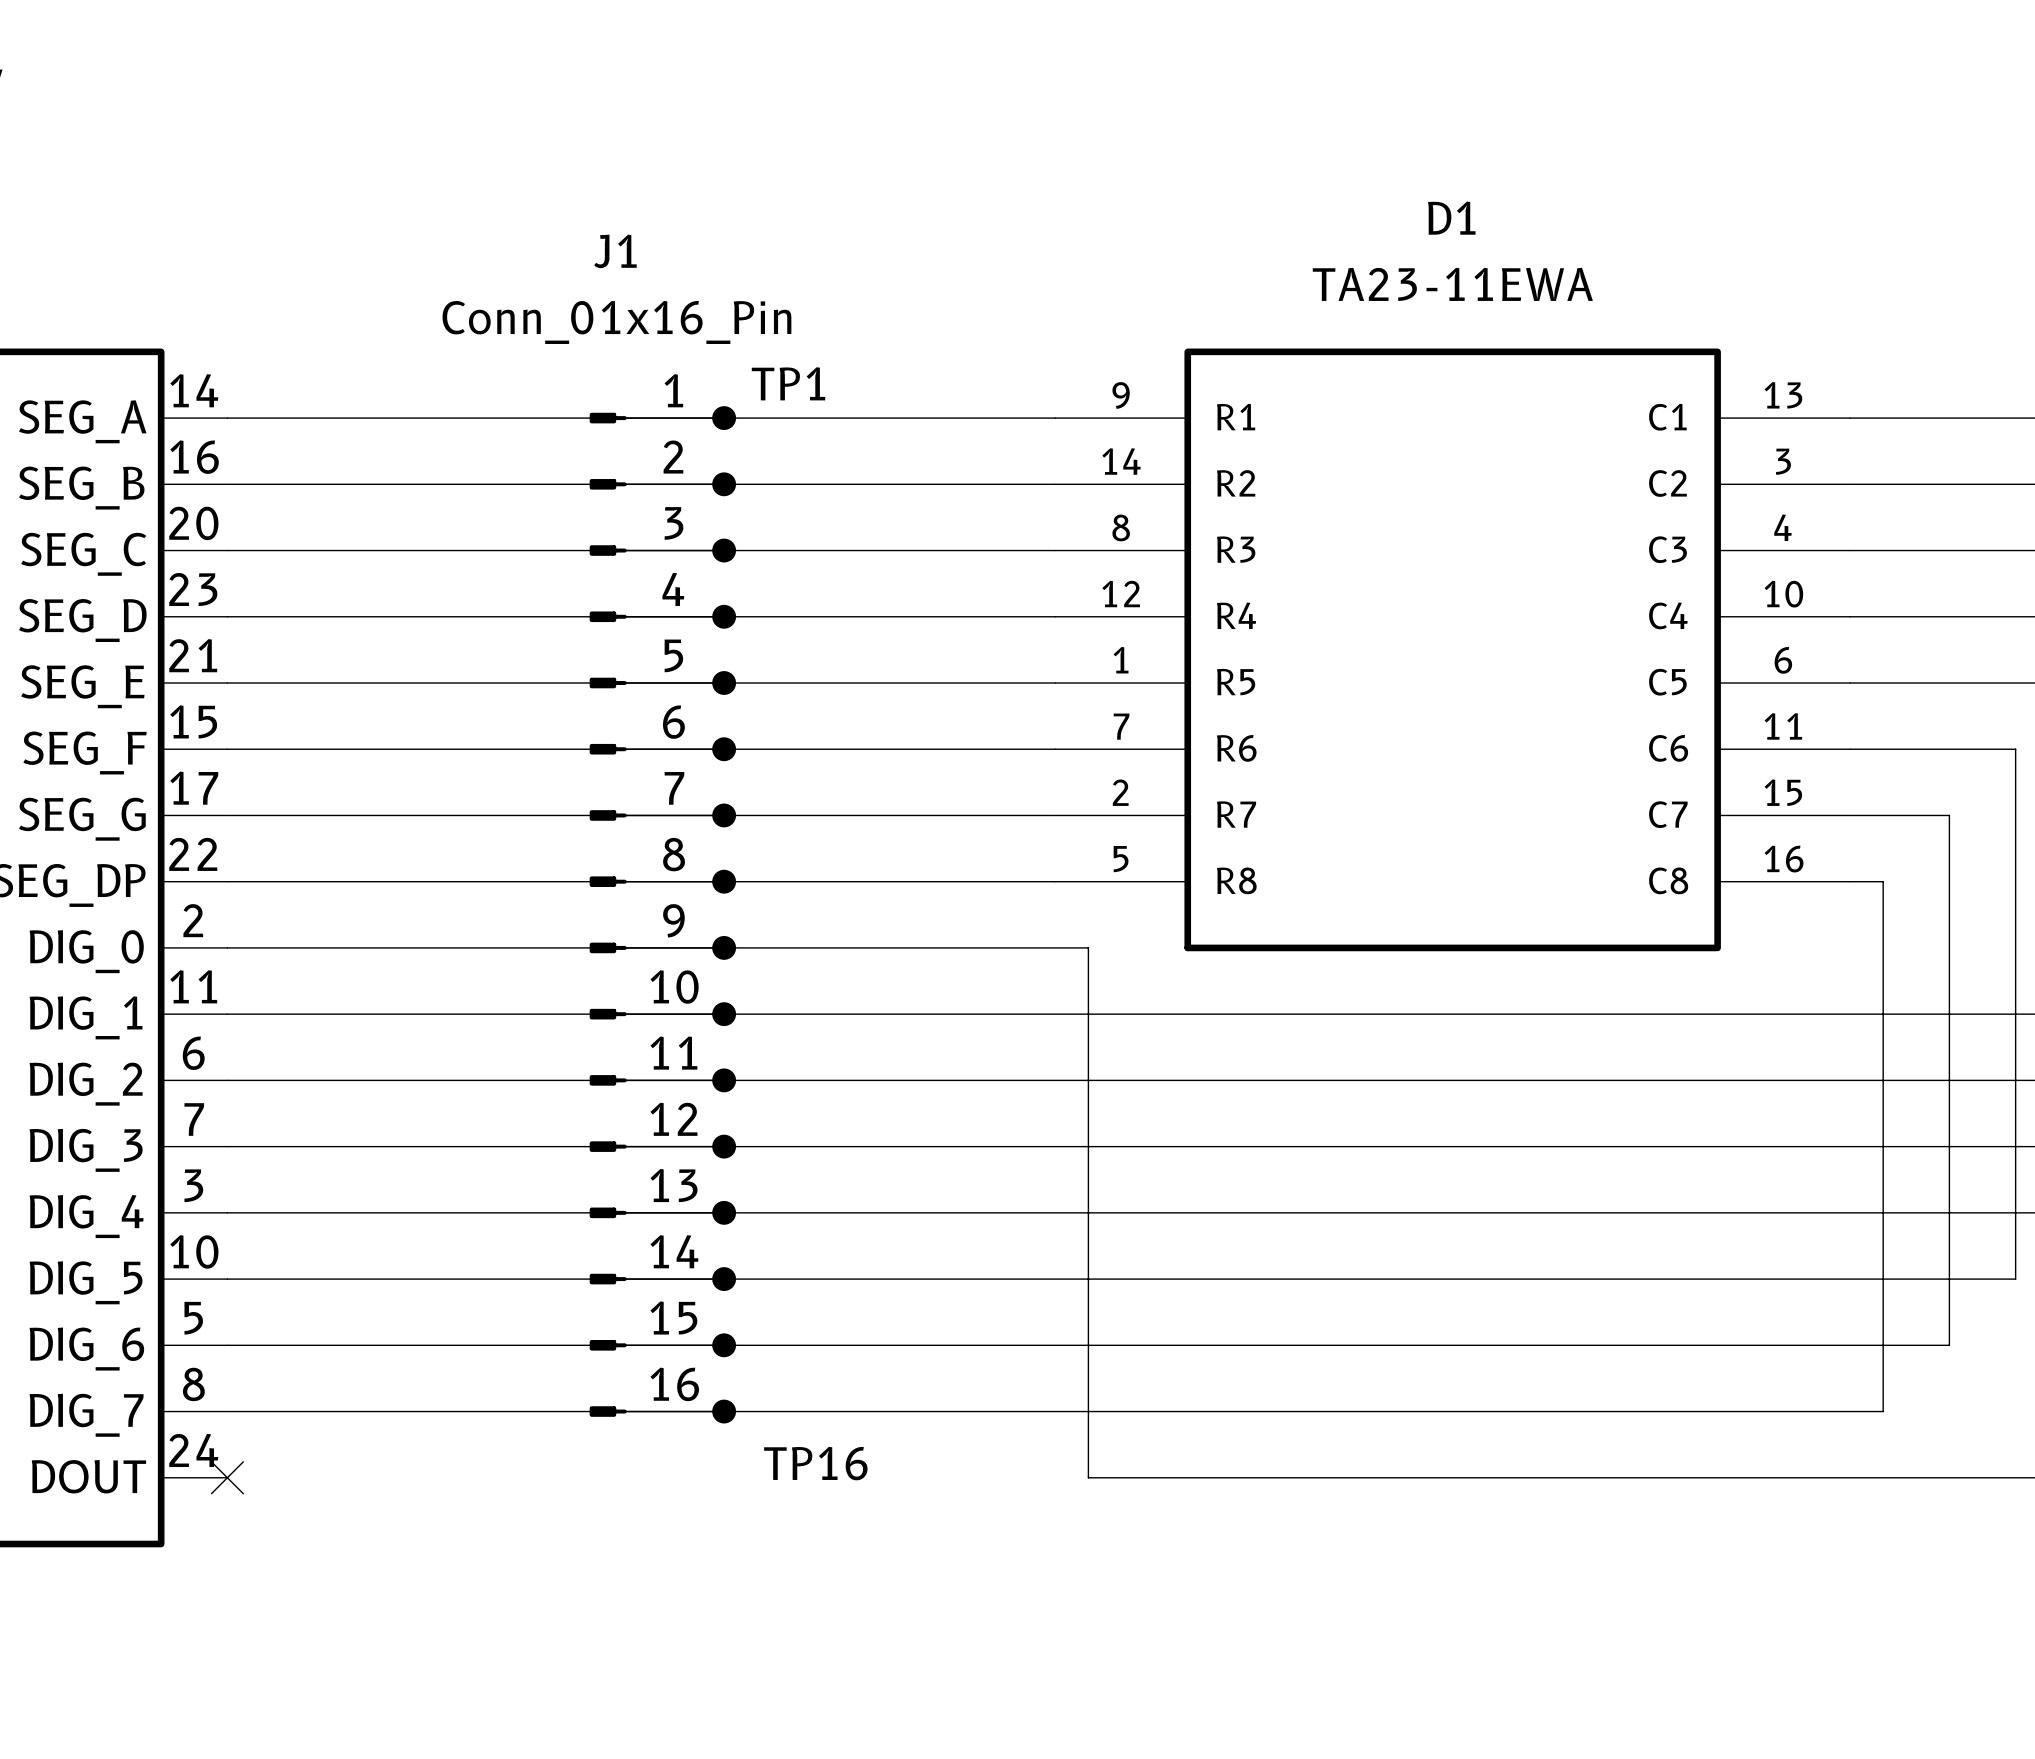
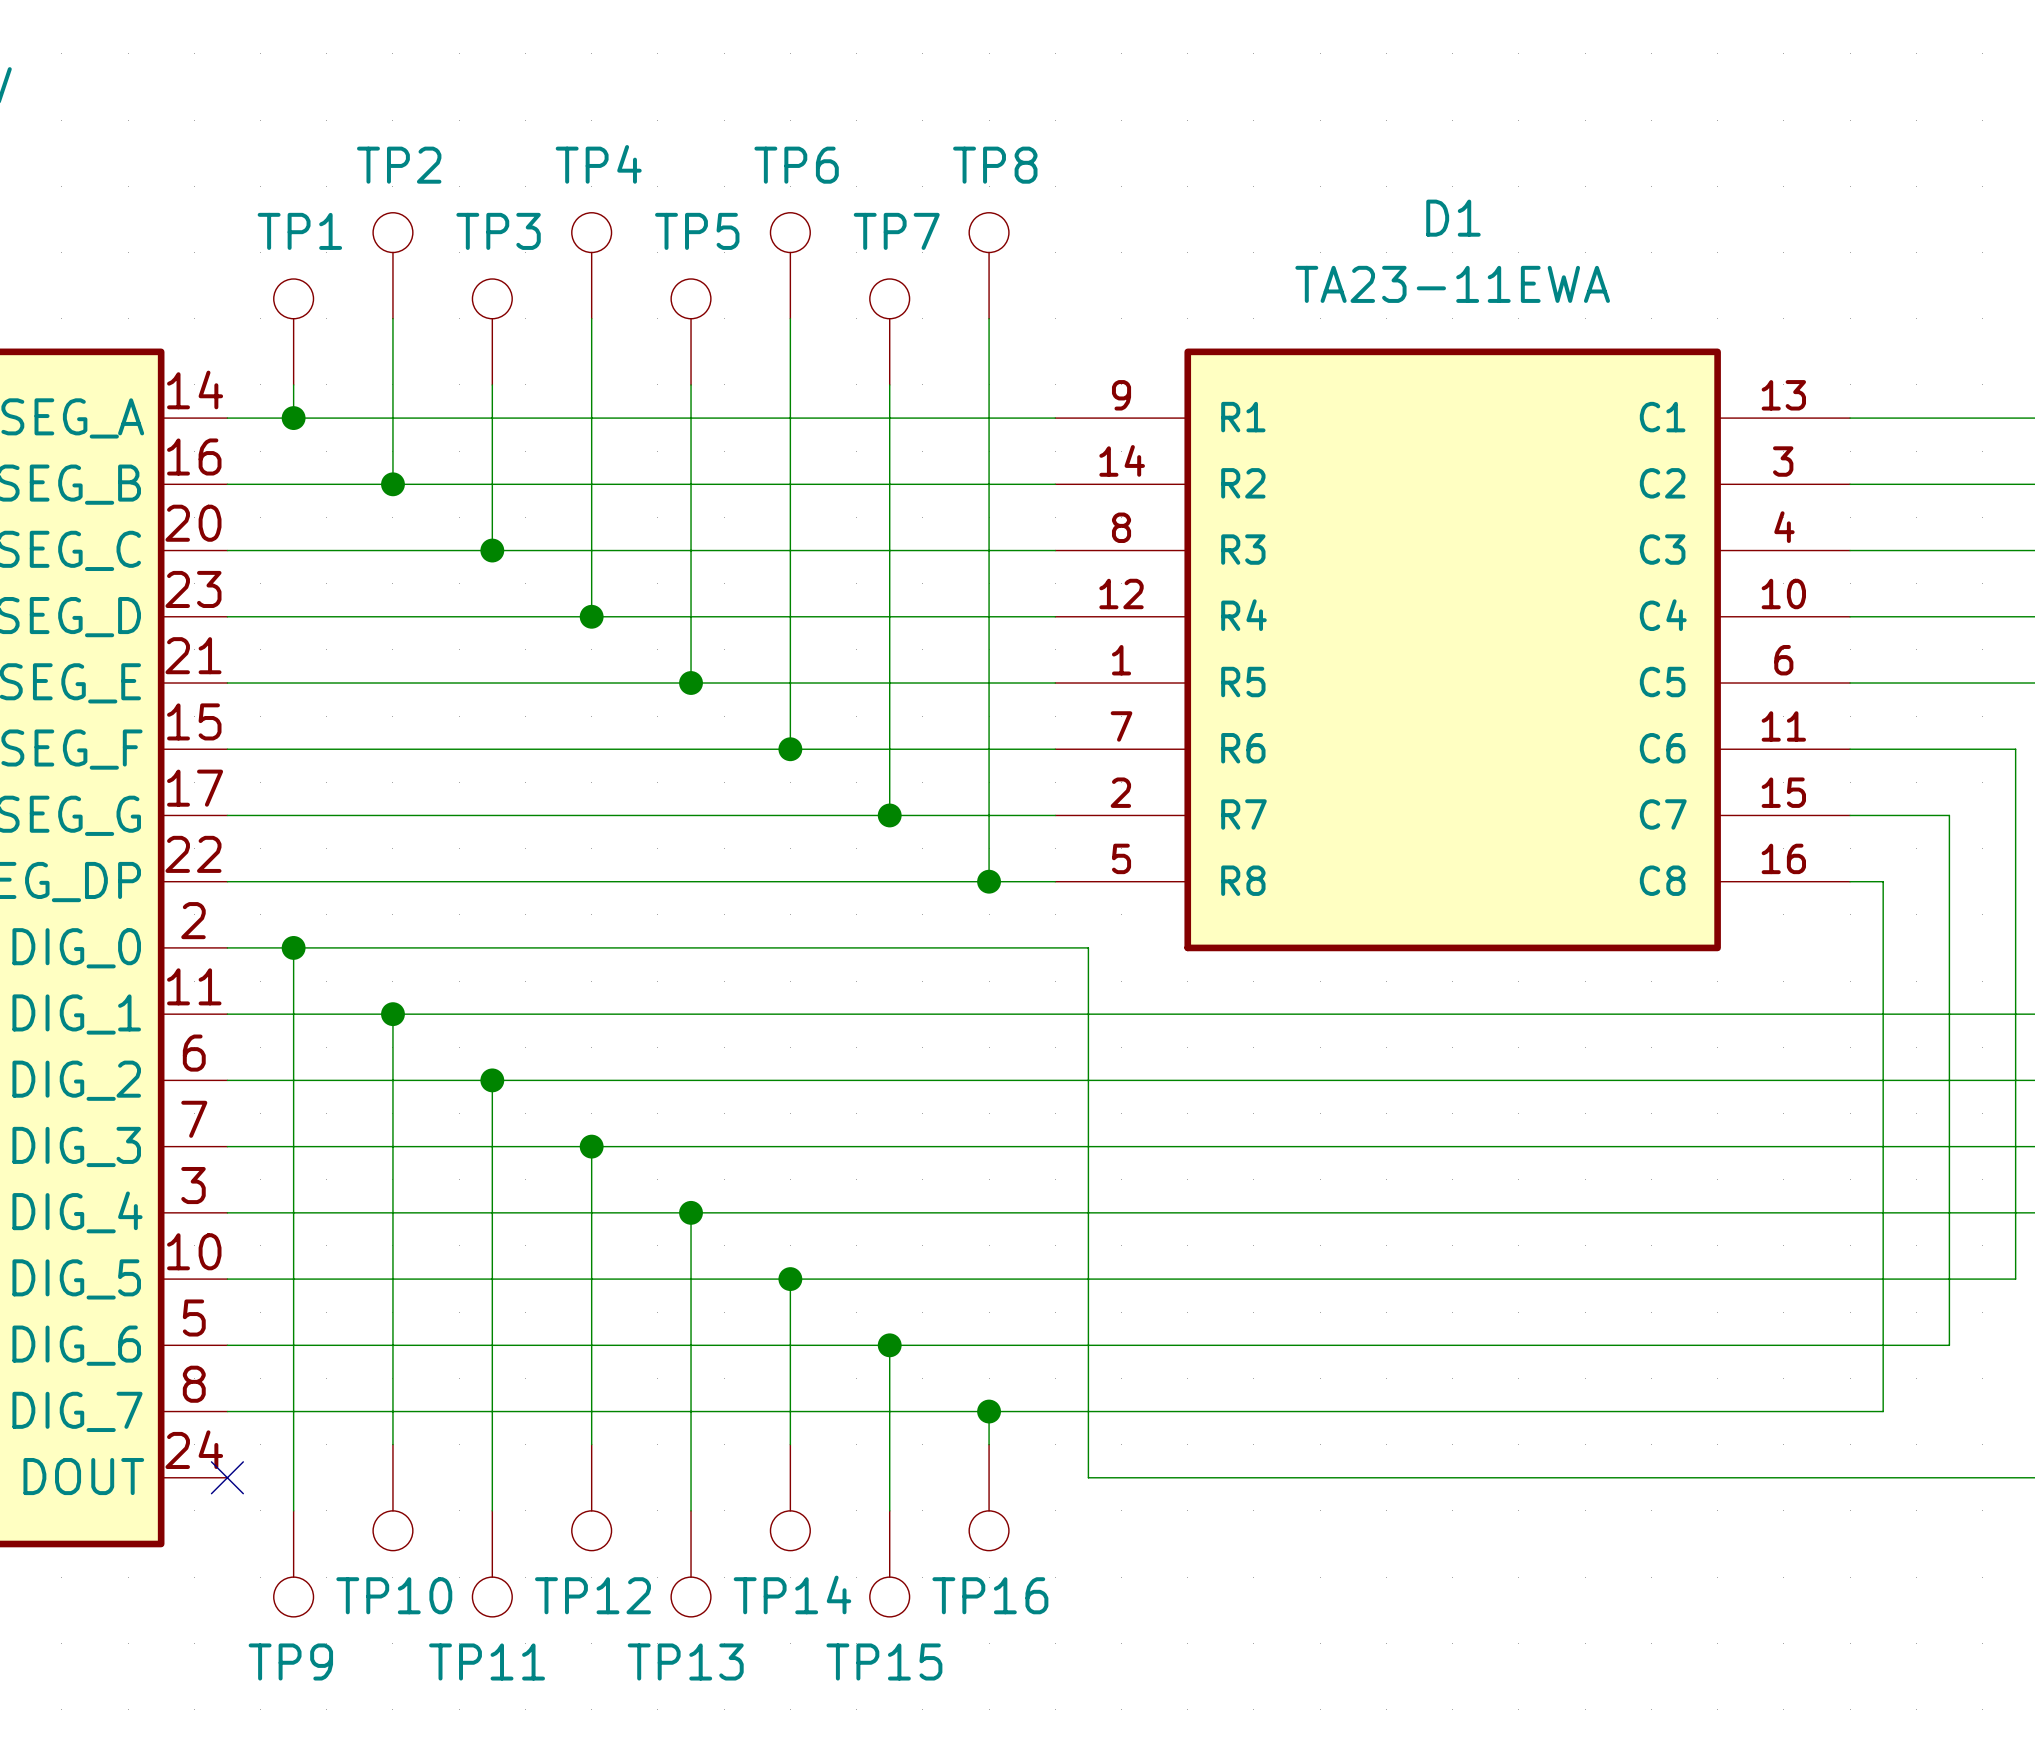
TP2: none -> (392, 265)
TP4: none -> (591, 265)
TP6: none -> (790, 265)
TP8: none -> (989, 265)
wire: none -> (392, 318) (392, 484)
wire: none -> (591, 318) (591, 616)
wire: none -> (790, 318) (790, 749)
wire: none -> (989, 318) (989, 881)
TP1: none -> (293, 331)
TP3: none -> (492, 331)
TP5: none -> (691, 331)
TP7: none -> (889, 331)
text: TP1 (788, 383) -> none
wire: none -> (293, 384) (293, 418)
wire: none -> (492, 384) (492, 550)
wire: none -> (691, 384) (691, 683)
wire: none -> (889, 384) (889, 815)
junction: none -> (293, 418)
junction: (724, 418) -> none
junction: none -> (392, 484)
junction: (724, 484) -> none
junction: none -> (492, 550)
junction: (724, 550) -> none
junction: none -> (591, 616)
junction: (724, 616) -> none
junction position: (724, 683) -> (691, 683)
junction: (724, 749) -> none
junction: none -> (790, 749)
junction: (724, 815) -> none
junction: none -> (889, 815)
junction: (724, 881) -> none
junction: none -> (989, 881)
J1: Conn_01x16_Pin (656, 914) -> none
wire: none -> (293, 947) (293, 1510)
junction: none -> (293, 947)
junction: (724, 947) -> none
wire: none -> (392, 1014) (392, 1444)
junction: none -> (392, 1014)
junction: (724, 1014) -> none
wire: none -> (492, 1080) (492, 1510)
junction: none -> (492, 1080)
junction: (724, 1080) -> none
wire: none -> (591, 1146) (591, 1444)
junction: none -> (591, 1146)
junction: (724, 1146) -> none
wire: none -> (691, 1212) (691, 1510)
junction position: (724, 1212) -> (691, 1212)
junction: (724, 1279) -> none
wire: none -> (790, 1279) (790, 1444)
junction: none -> (790, 1279)
junction: (724, 1345) -> none
wire: none -> (889, 1345) (889, 1510)
junction: none -> (889, 1345)
junction: (724, 1411) -> none
wire: none -> (989, 1411) (989, 1444)
junction: none -> (989, 1411)
text: TP16 (815, 1463) -> none
TP10: none -> (392, 1497)
TP12: none -> (591, 1497)
TP14: none -> (790, 1497)
TP16: none -> (989, 1497)
TP9: none -> (293, 1563)
TP11: none -> (492, 1563)
TP13: none -> (691, 1563)
TP15: none -> (889, 1563)

